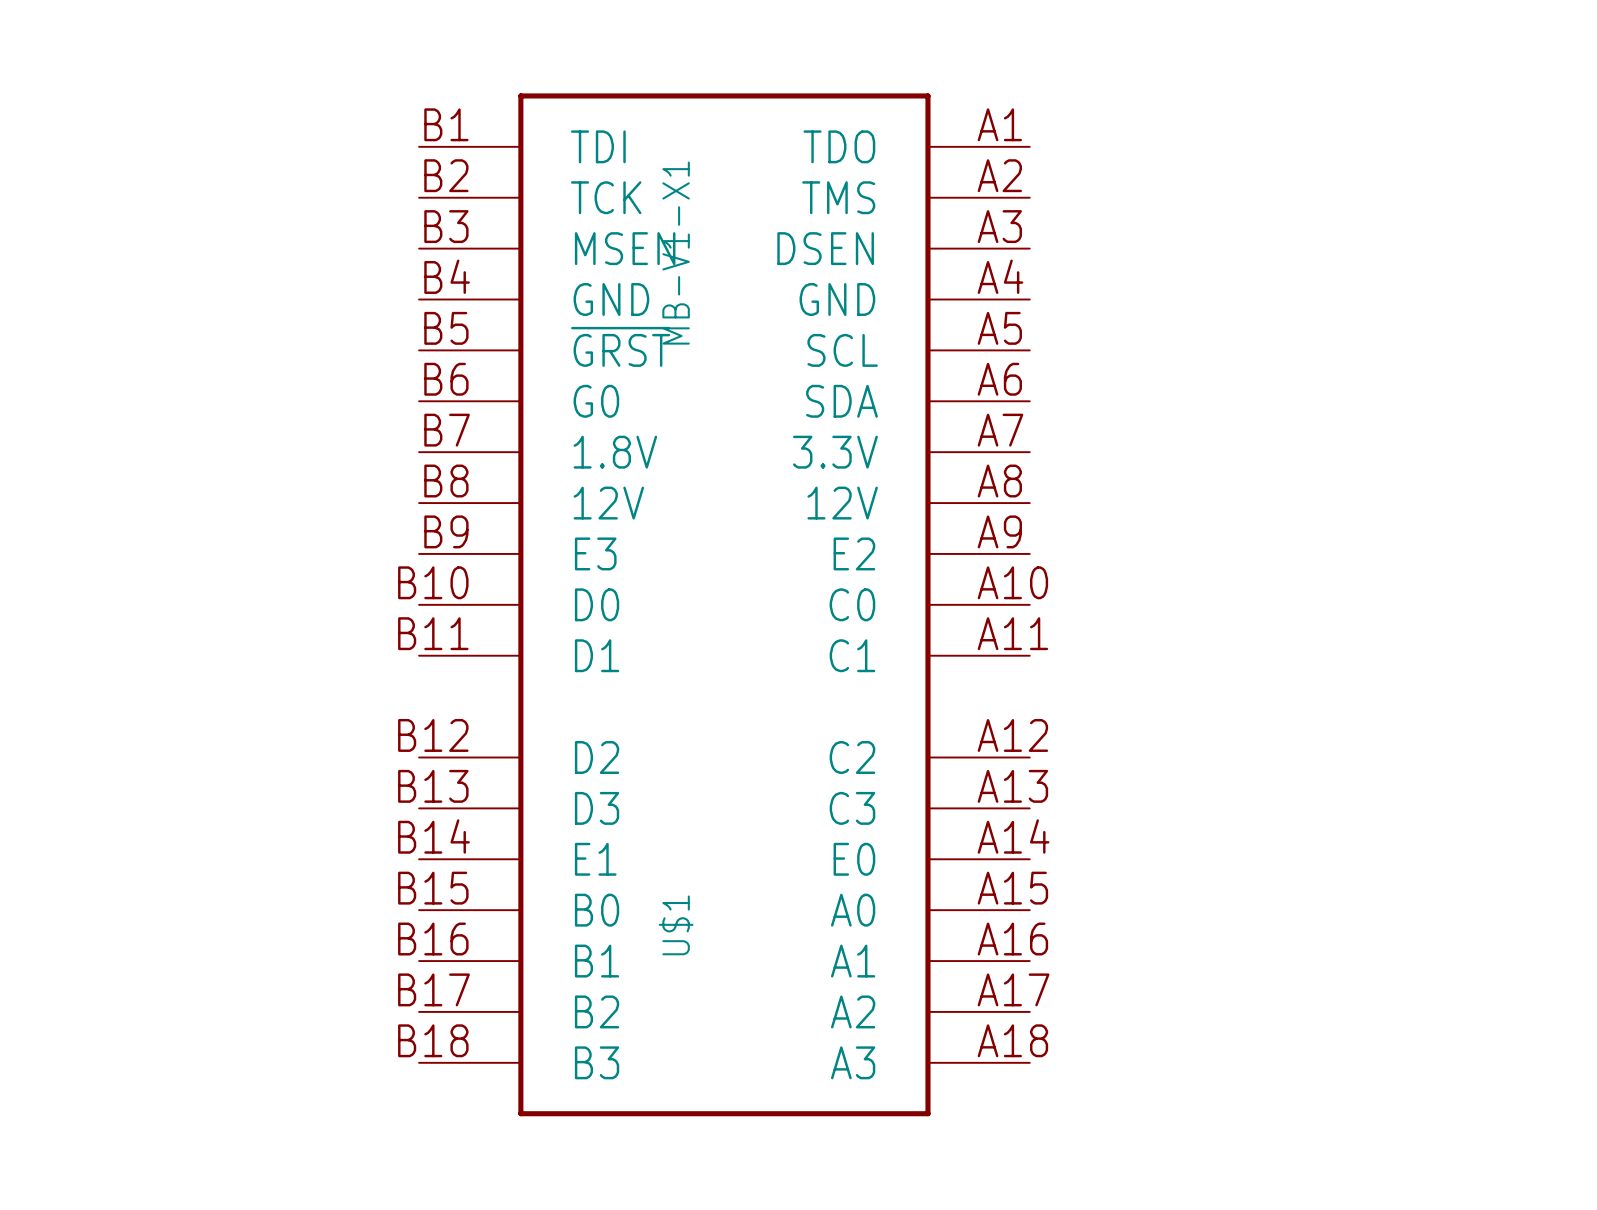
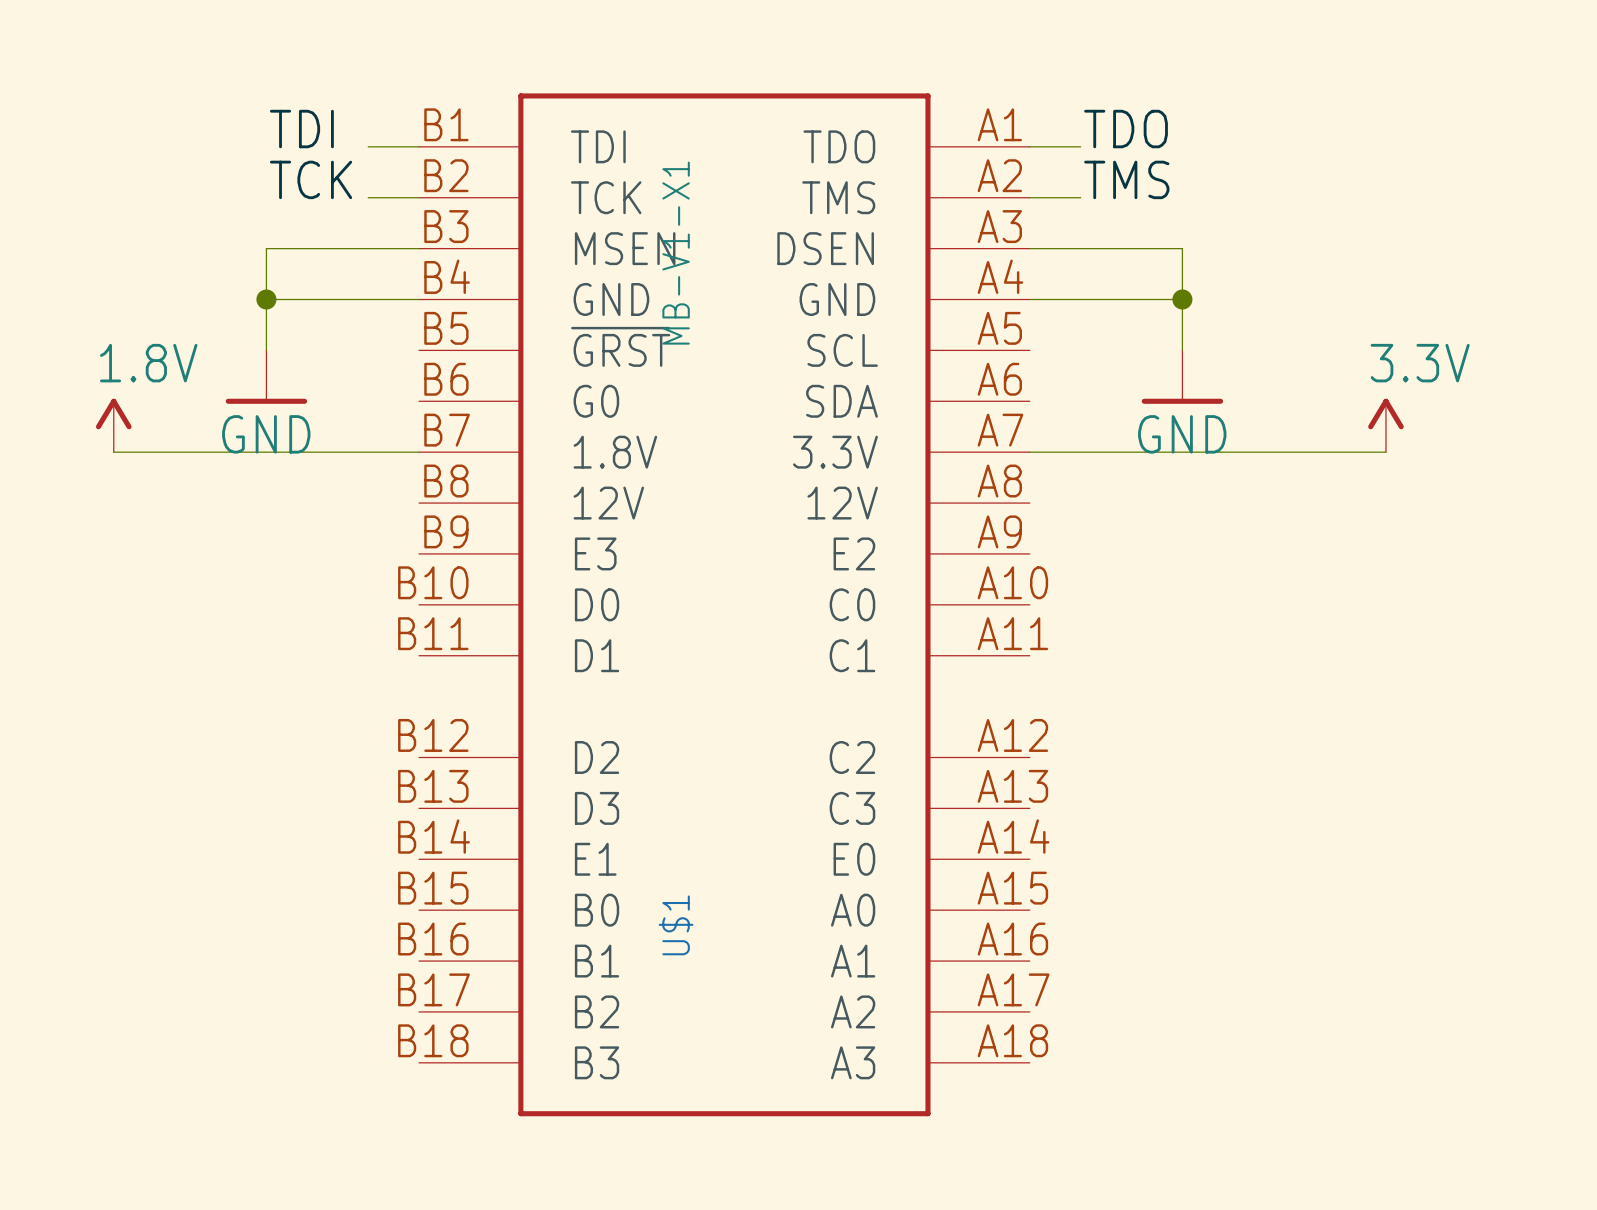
label: none -> TDI (301, 129)
label: none -> TDO (1126, 129)
wire: none -> (368, 146) (419, 146)
wire: none -> (1029, 146) (1080, 146)
label: none -> TCK (311, 179)
label: none -> TMS (1126, 179)
wire: none -> (368, 197) (419, 197)
wire: none -> (1029, 197) (1080, 197)
wire: none -> (419, 248) (266, 248) (266, 350)
wire: none -> (1029, 248) (1182, 248) (1182, 350)
wire: none -> (266, 299) (419, 299)
junction: none -> (266, 299)
wire: none -> (1029, 299) (1182, 299)
junction: none -> (1182, 299)
power symbol: none -> GND (266, 377)
power symbol: none -> GND (1182, 377)
power symbol: none -> 1.8V (113, 425)
power symbol: none -> 3.3V (1385, 425)
wire: none -> (113, 452) (419, 452)
wire: none -> (1029, 452) (1385, 452)

